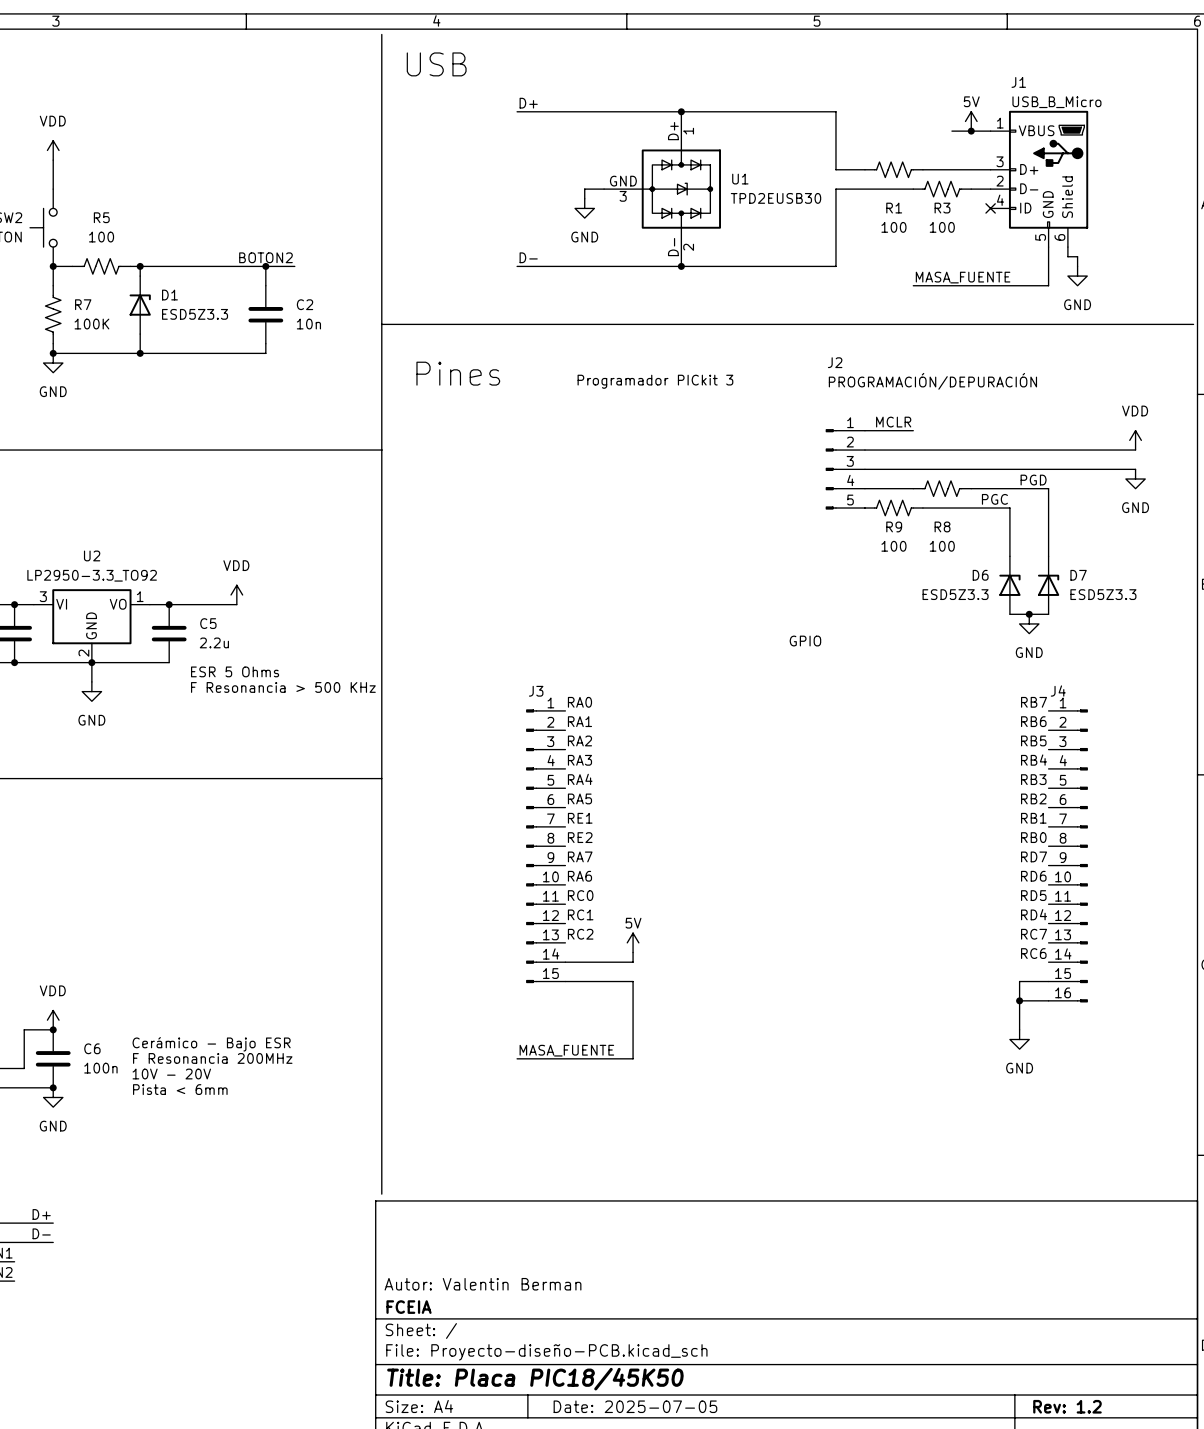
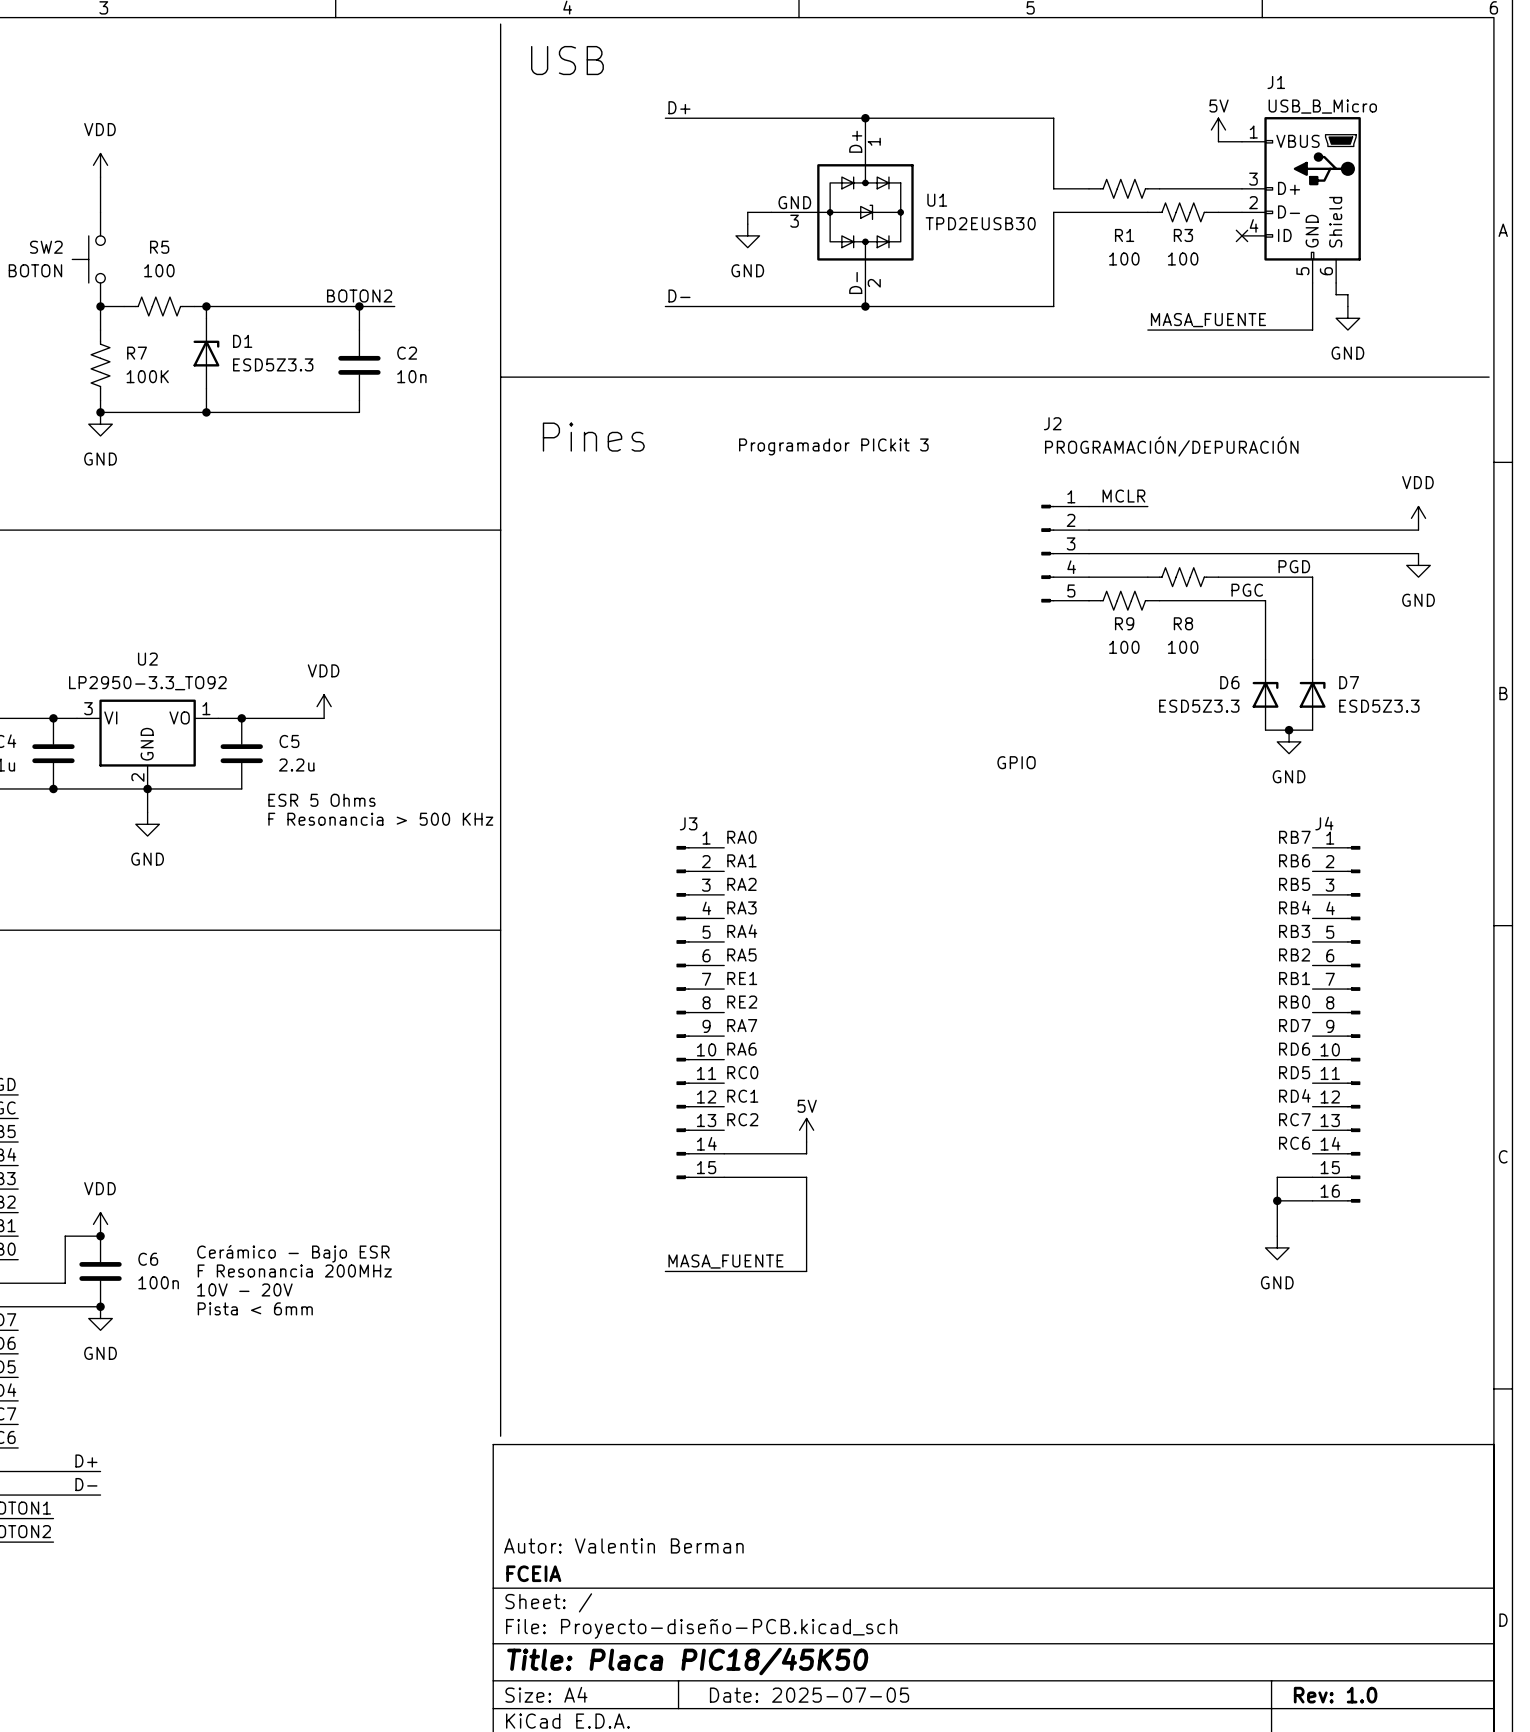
wire: (951, 131) (971, 131) -> none
junction: (971, 131) -> none
title block: Rev: 1.2 (1067, 1406) -> Rev: 1.0 (1335, 1695)

